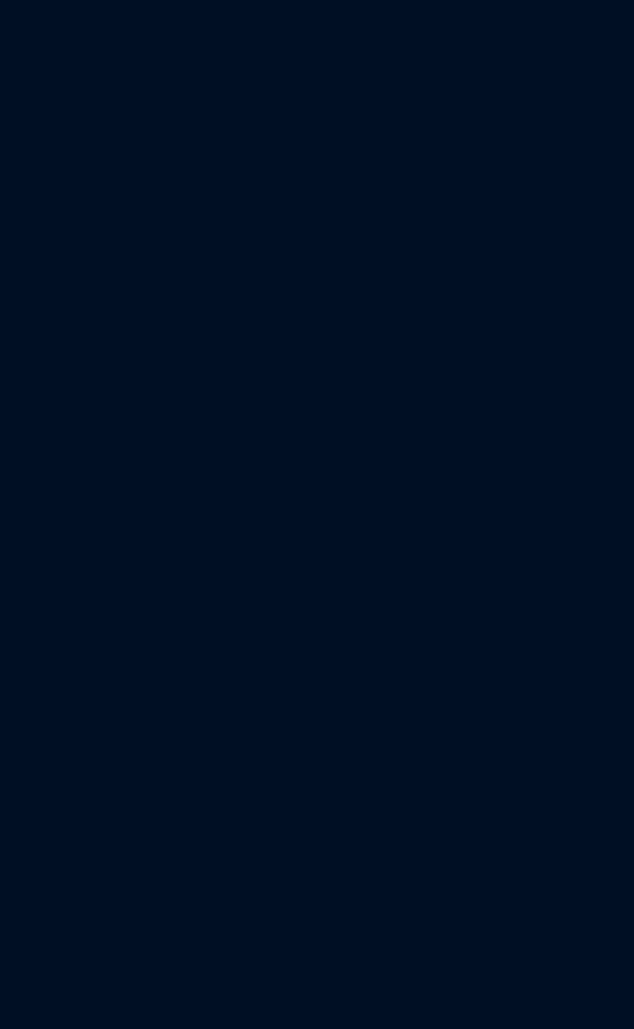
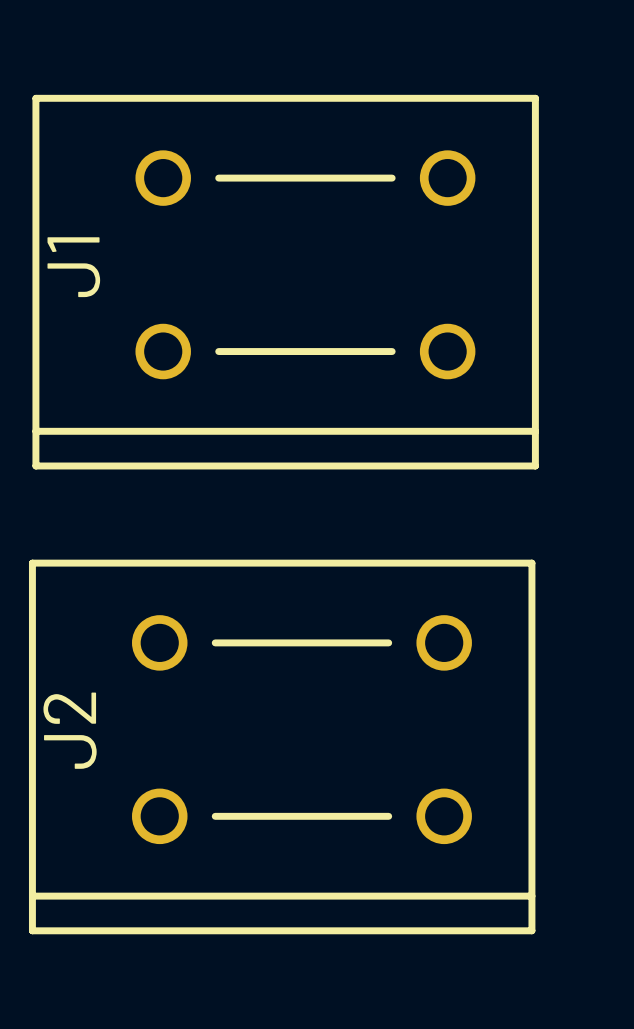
J1: none -> (285, 282)
J2: none -> (282, 746)

